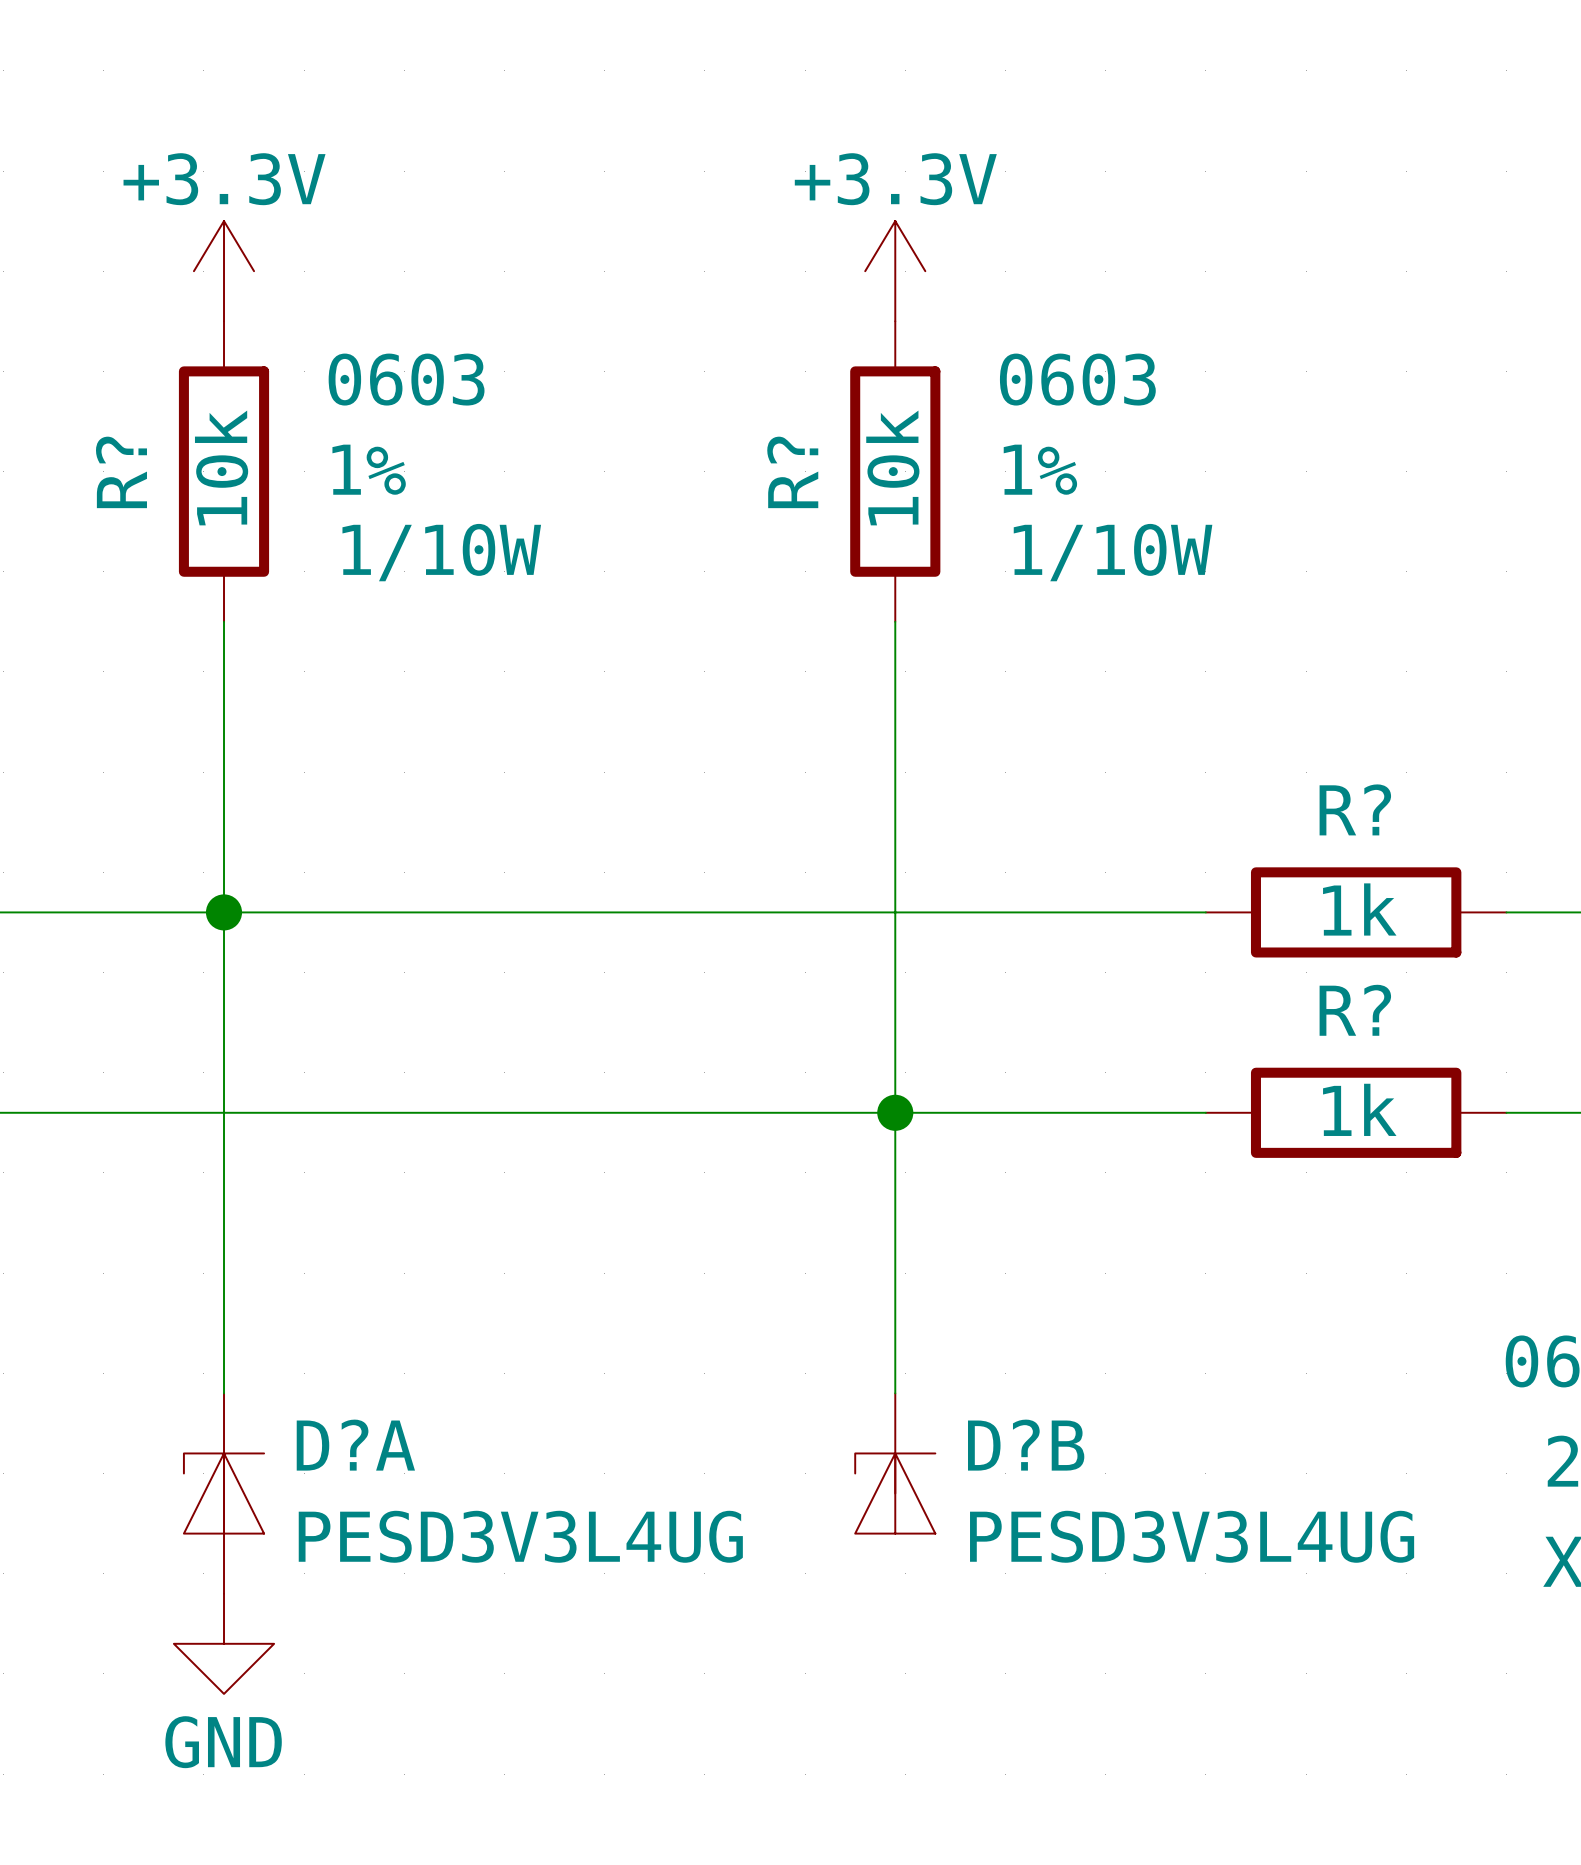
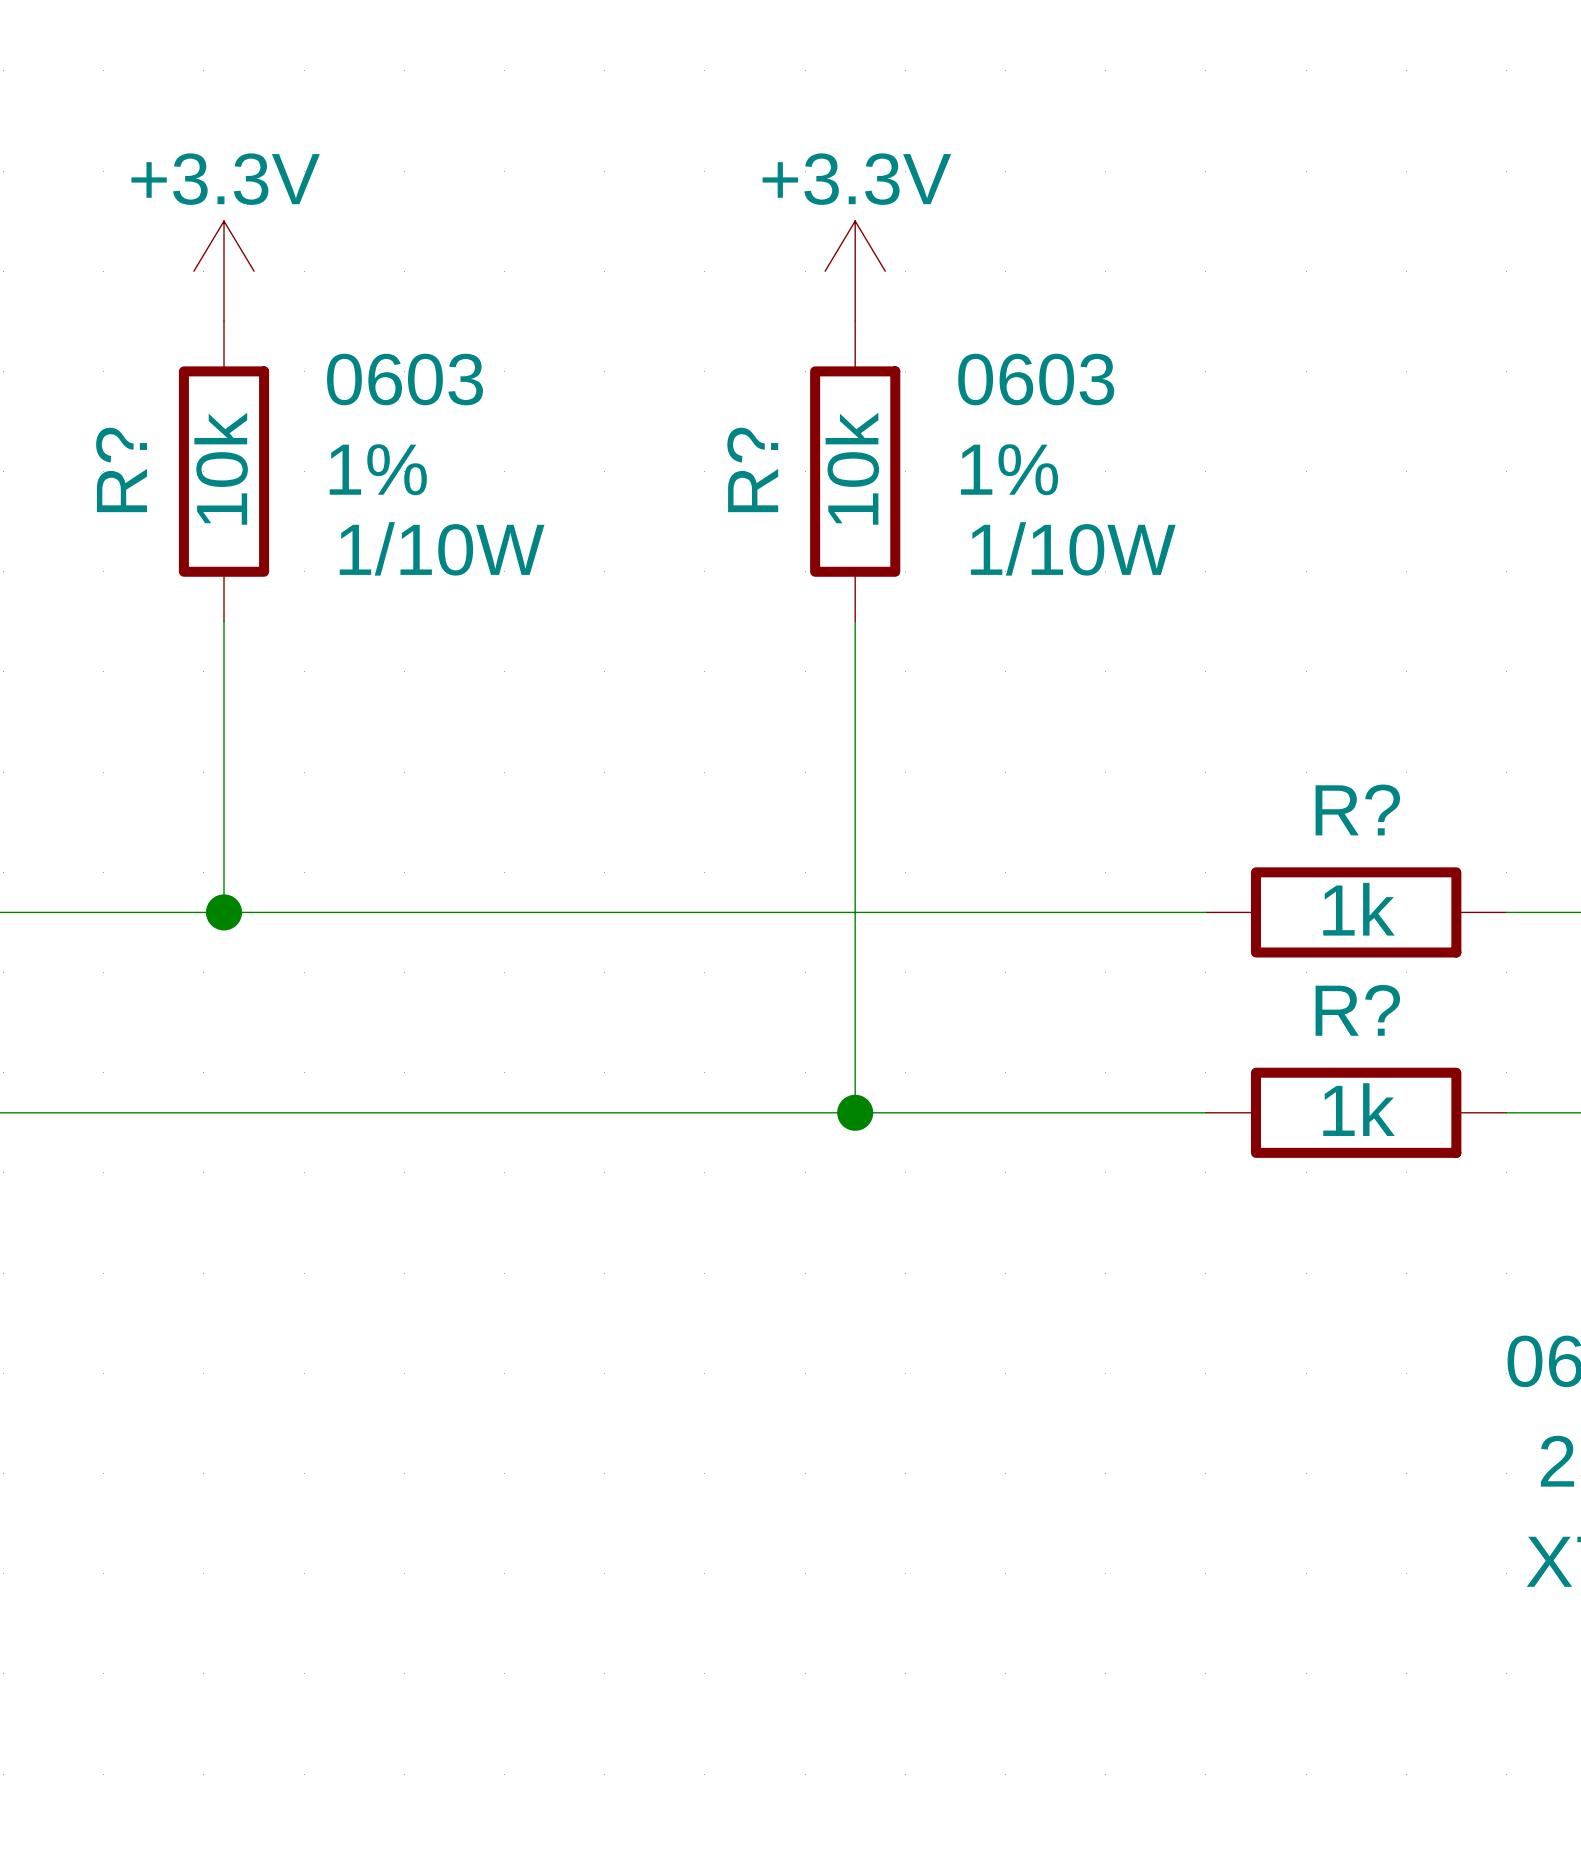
power symbol position: +3.3V (895, 271) -> +3.3V (855, 271)
R? position: (895, 471) -> (855, 471)
wire: none -> (855, 621) (855, 1112)
wire: (895, 621) (895, 1393) -> none
wire: (224, 912) (224, 1393) -> none
junction position: (895, 1112) -> (855, 1112)
D?B: PESD3V3L4UG (895, 1463) -> none
D?A: PESD3V3L4UG (224, 1493) -> none
power symbol: GND (224, 1643) -> none

